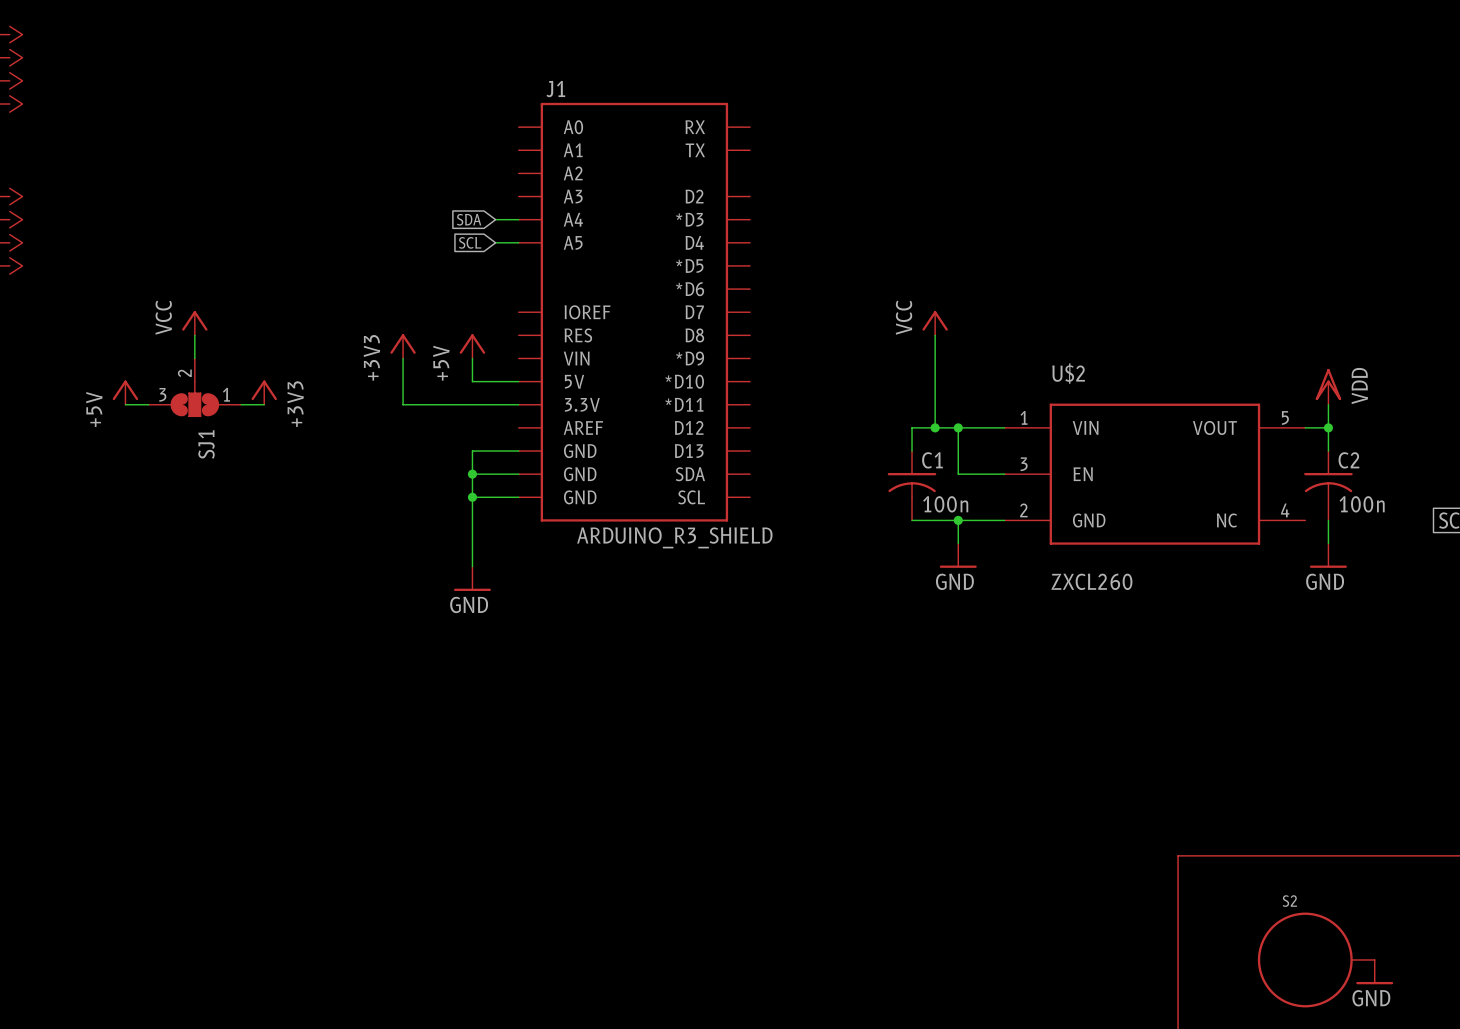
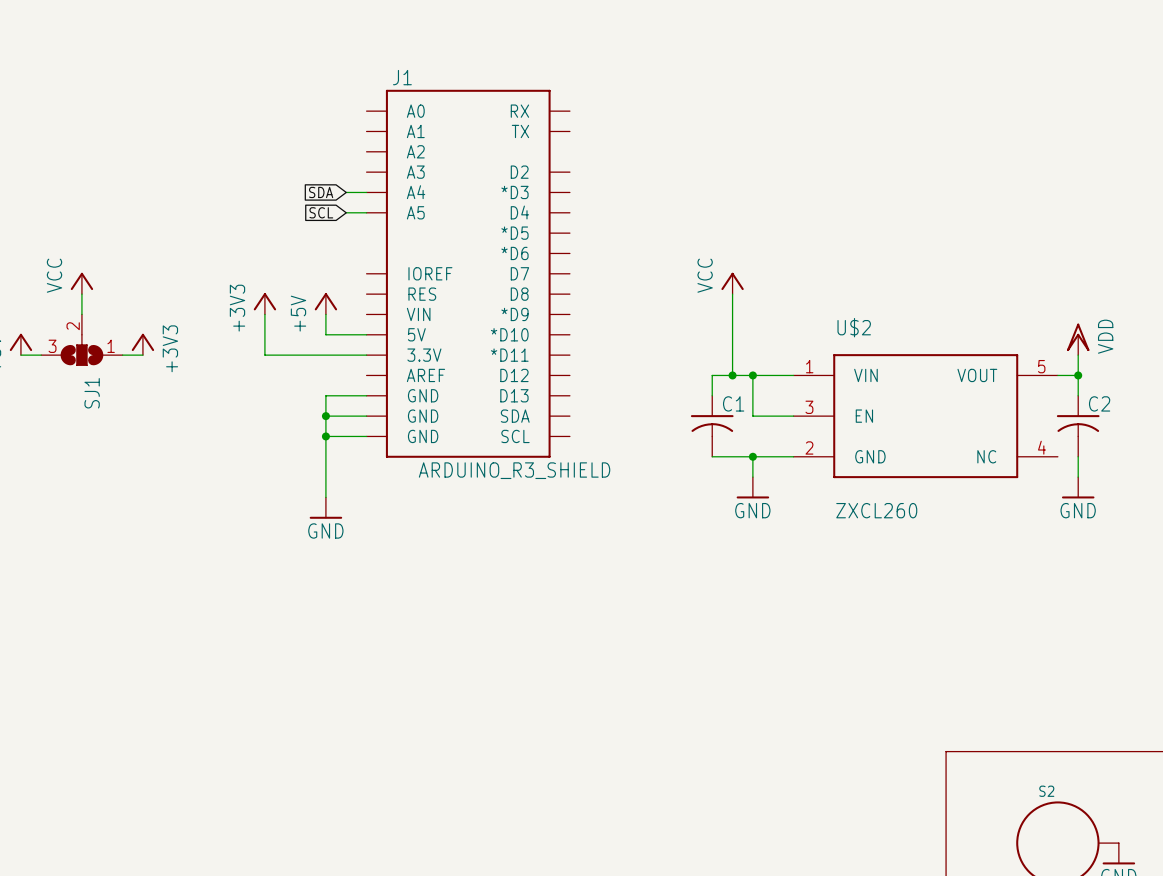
C1 value: 100n (945, 504) -> none
C2 value: 100n (1362, 504) -> none

